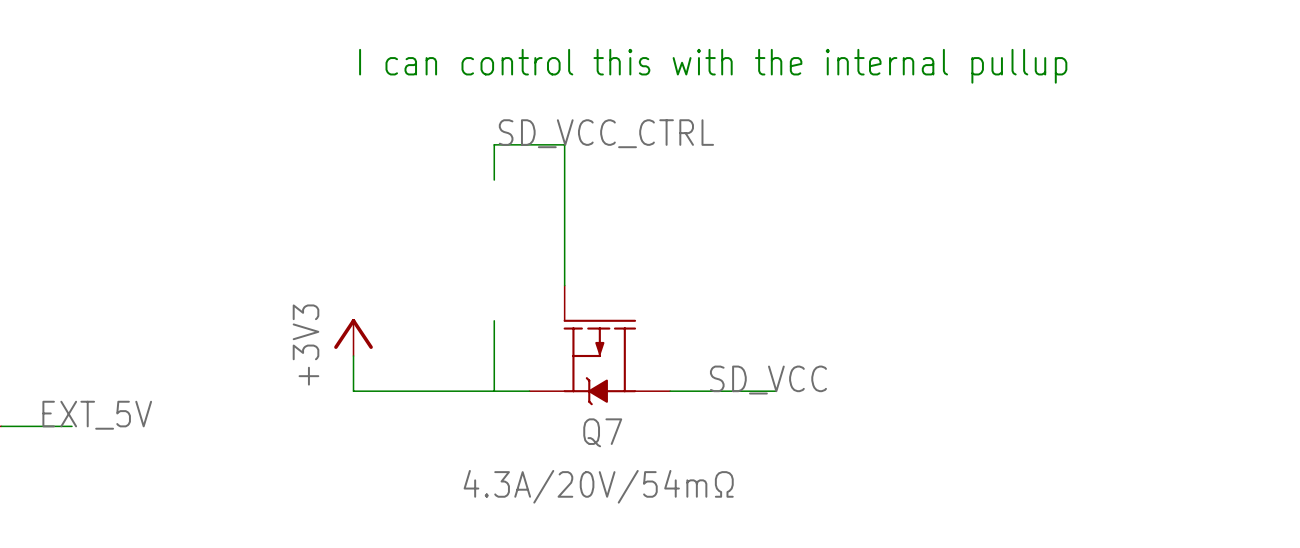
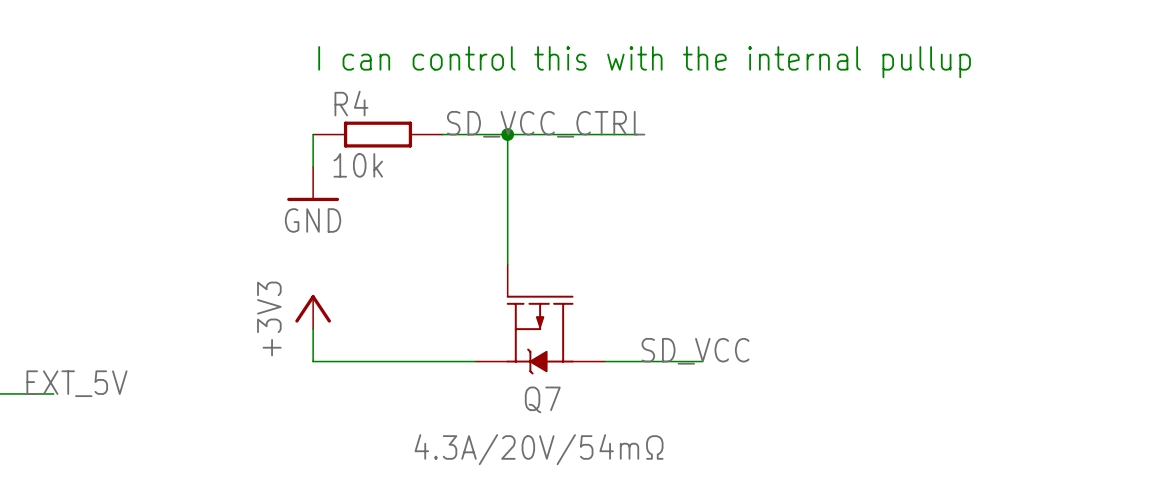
R4: none -> 10k (377, 134)
wire: (494, 144) (494, 180) -> (313, 134) (313, 166)
wire: none -> (507, 134) (637, 134)
junction: none -> (507, 134)
power symbol: none -> GND (313, 184)
wire: (494, 320) (494, 391) -> none

